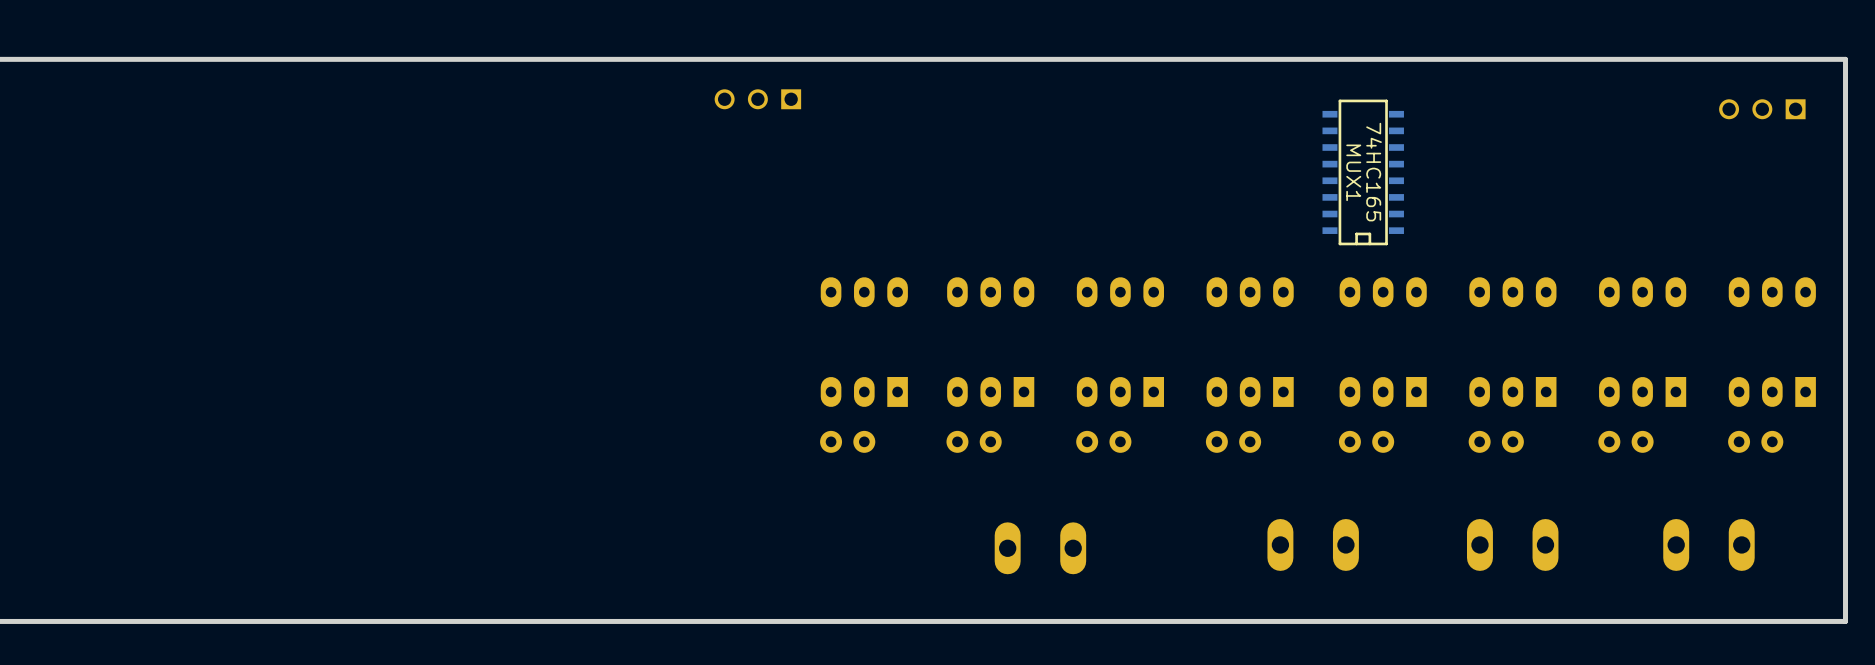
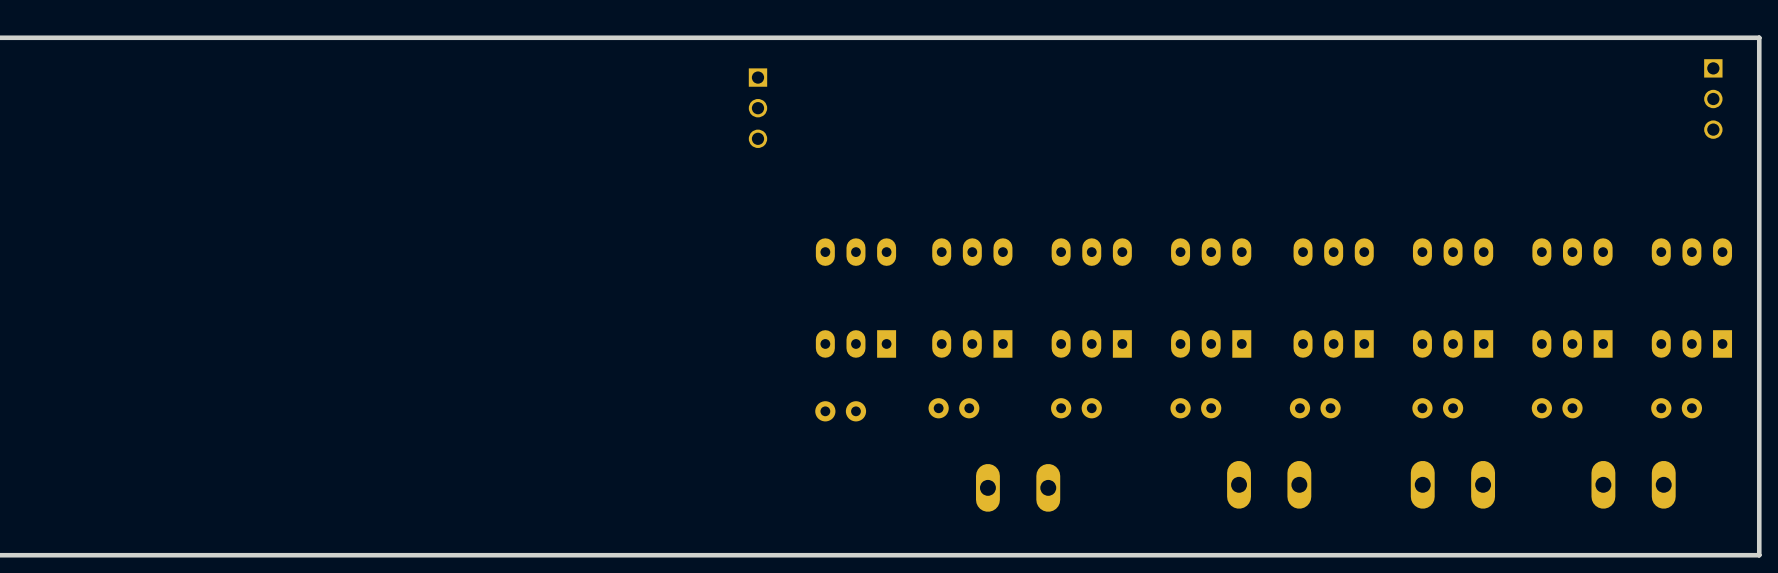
part rotation: 0° (757, 99) -> 90° counterclockwise (757, 108)
part rotation: 0° (1762, 109) -> 90° counterclockwise (1713, 98)
MUX1: 74HC165 (1363, 172) -> none
part position: (847, 441) -> (840, 411)
part position: (974, 441) -> (953, 408)
part position: (1103, 441) -> (1076, 408)
part position: (1233, 441) -> (1195, 408)
part position: (1366, 441) -> (1315, 408)
part position: (1496, 441) -> (1437, 408)
part position: (1625, 441) -> (1557, 408)
part position: (1755, 441) -> (1676, 408)

